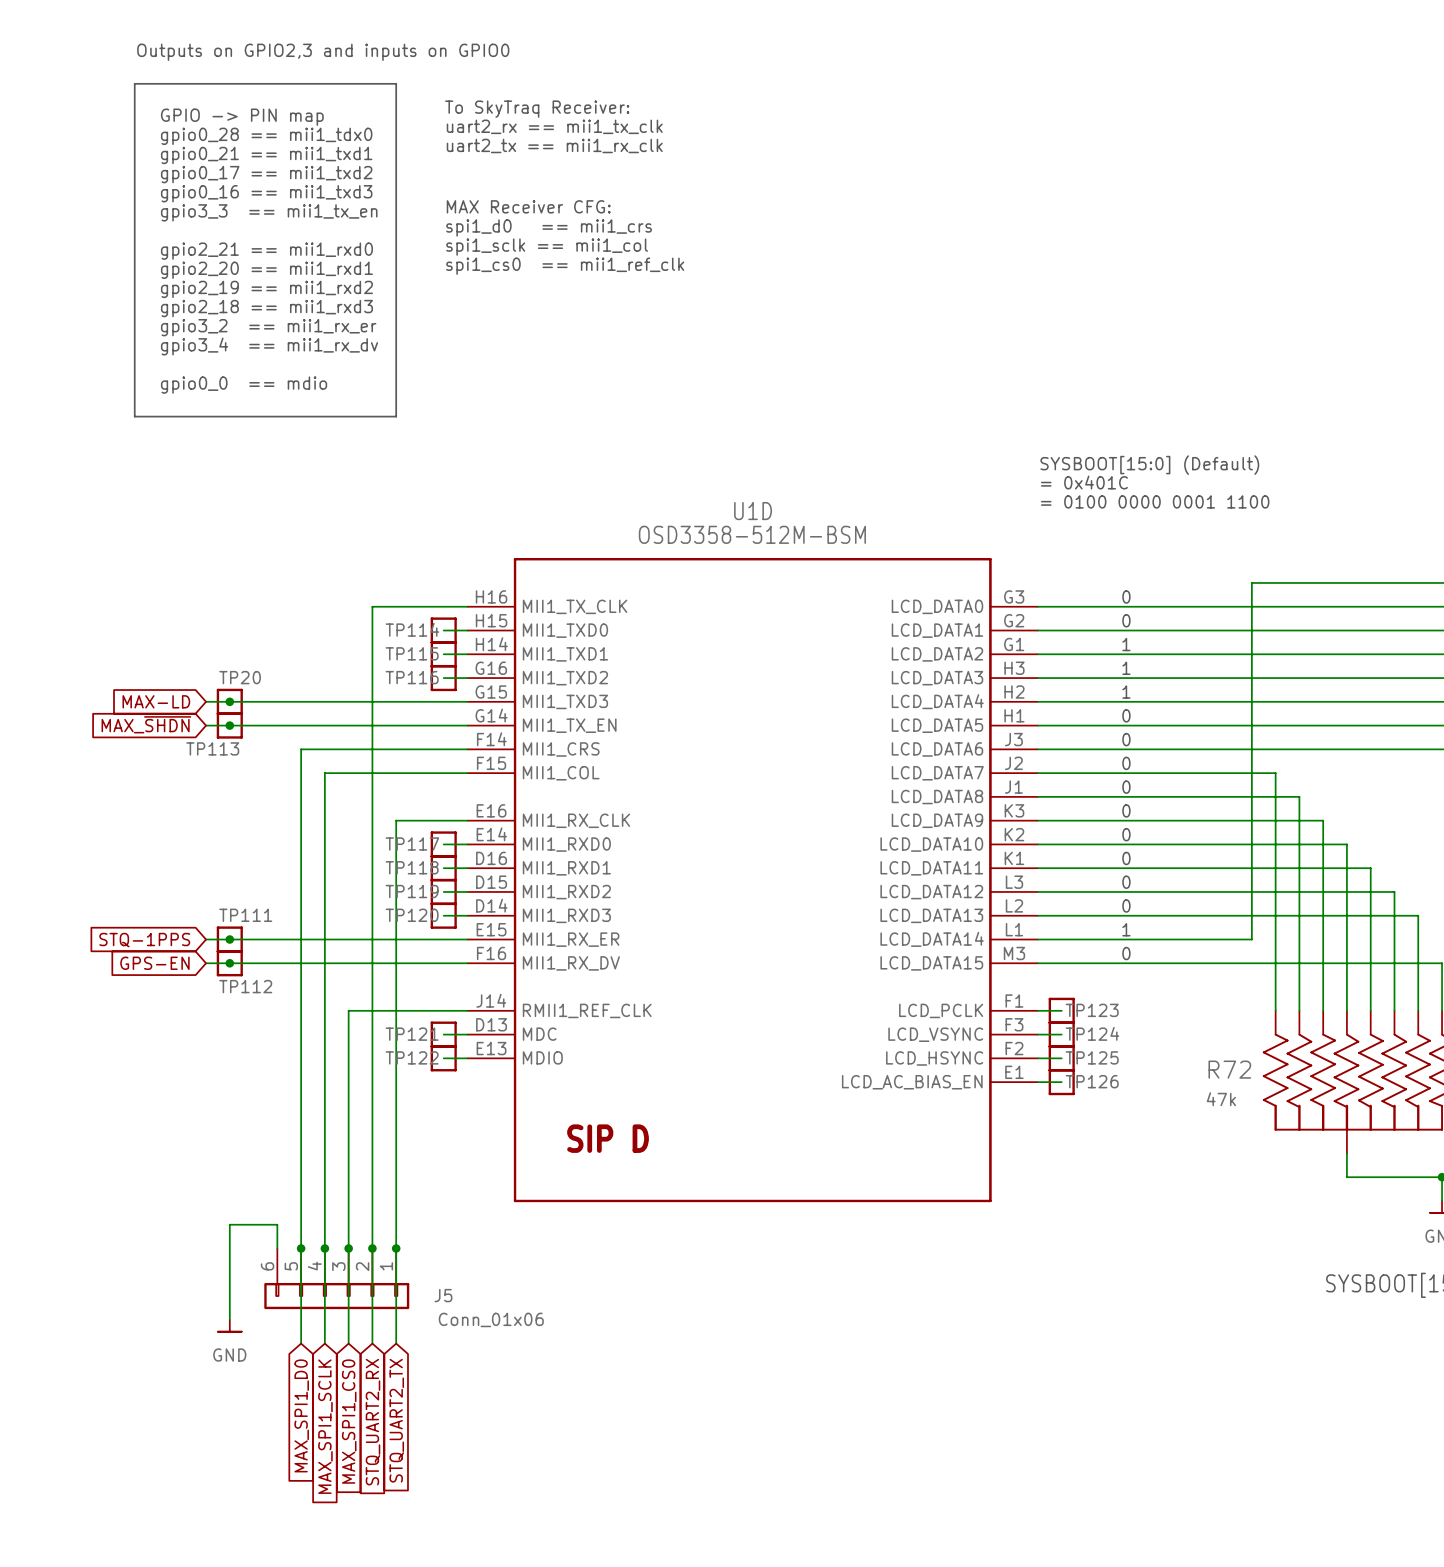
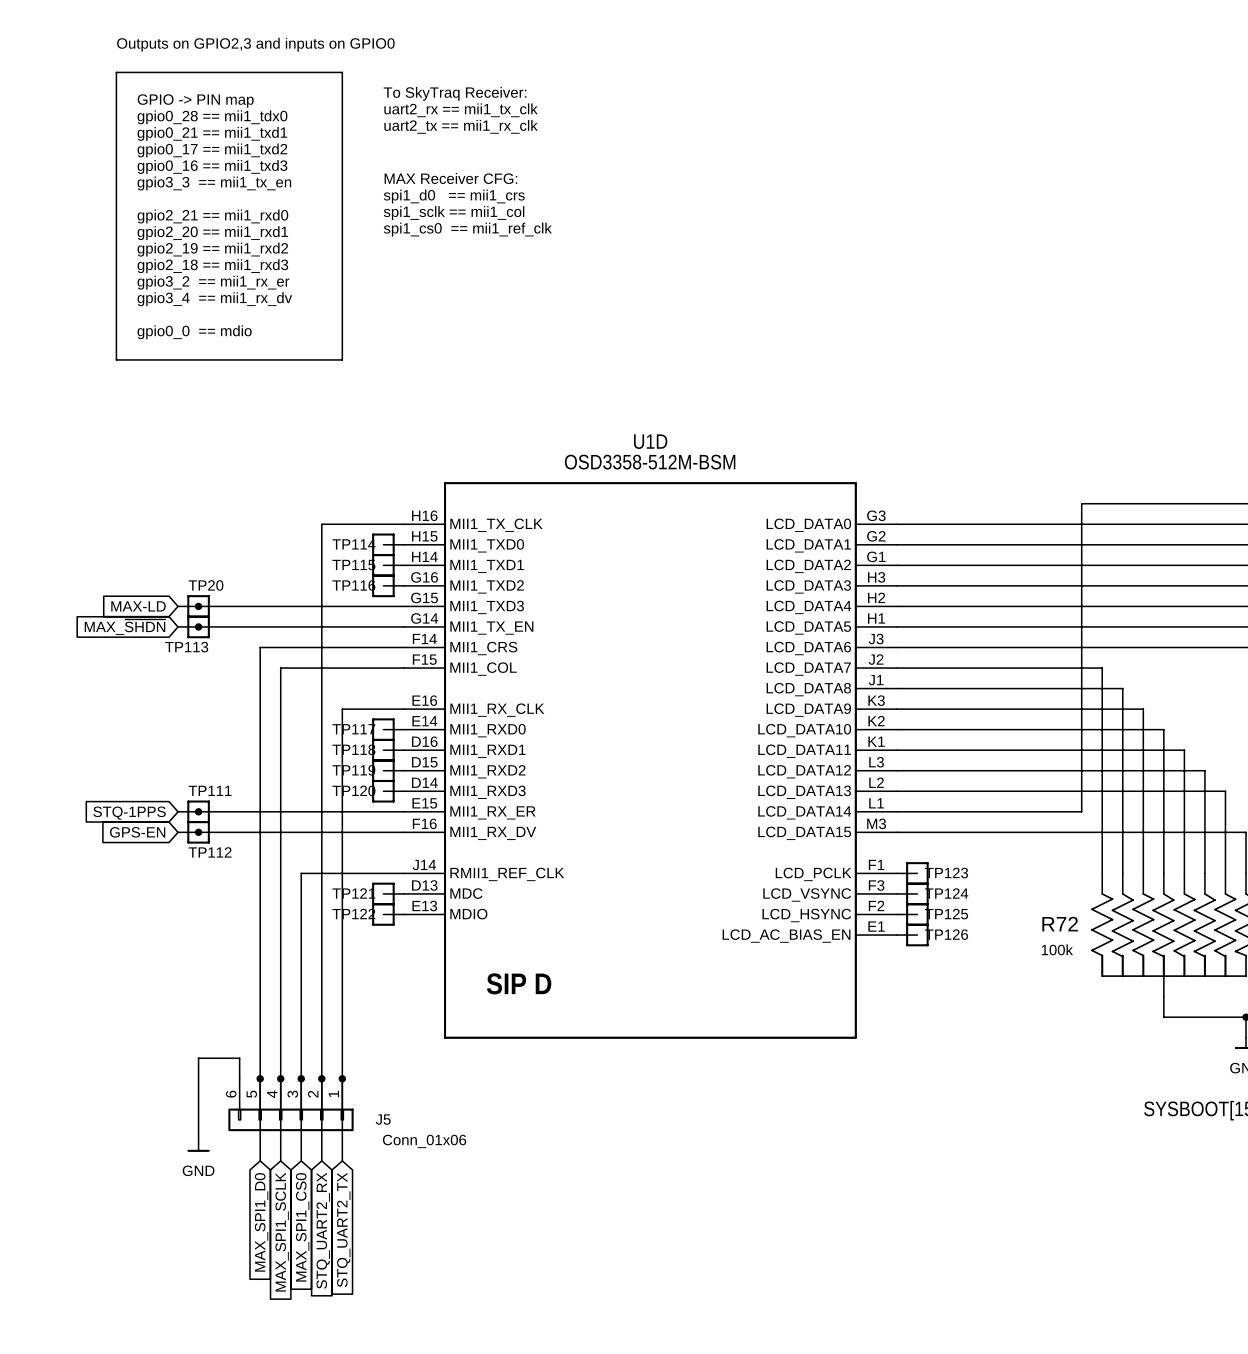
text: SYSBOOT[15:0] (Default) (1149, 465) -> none
text: = 0x401C (1084, 482) -> none
text: = 0100 0000 0001 1100 (1155, 501) -> none
text: 0 (1126, 597) -> none
text: 0 (1126, 620) -> none
text: 1 (1126, 644) -> none
text: 1 (1126, 668) -> none
text: 1 (1126, 692) -> none
text: 0 (1126, 715) -> none
text: 0 (1126, 739) -> none
text: 0 (1126, 763) -> none
text: 0 (1126, 787) -> none
text: 0 (1126, 810) -> none
text: 0 (1126, 834) -> none
text: 0 (1126, 858) -> none
text: 0 (1126, 882) -> none
text: 0 (1126, 906) -> none
text: 1 (1126, 929) -> none
text: 0 (1126, 953) -> none
R72 value: 47k (1221, 1099) -> 100k (1057, 949)

